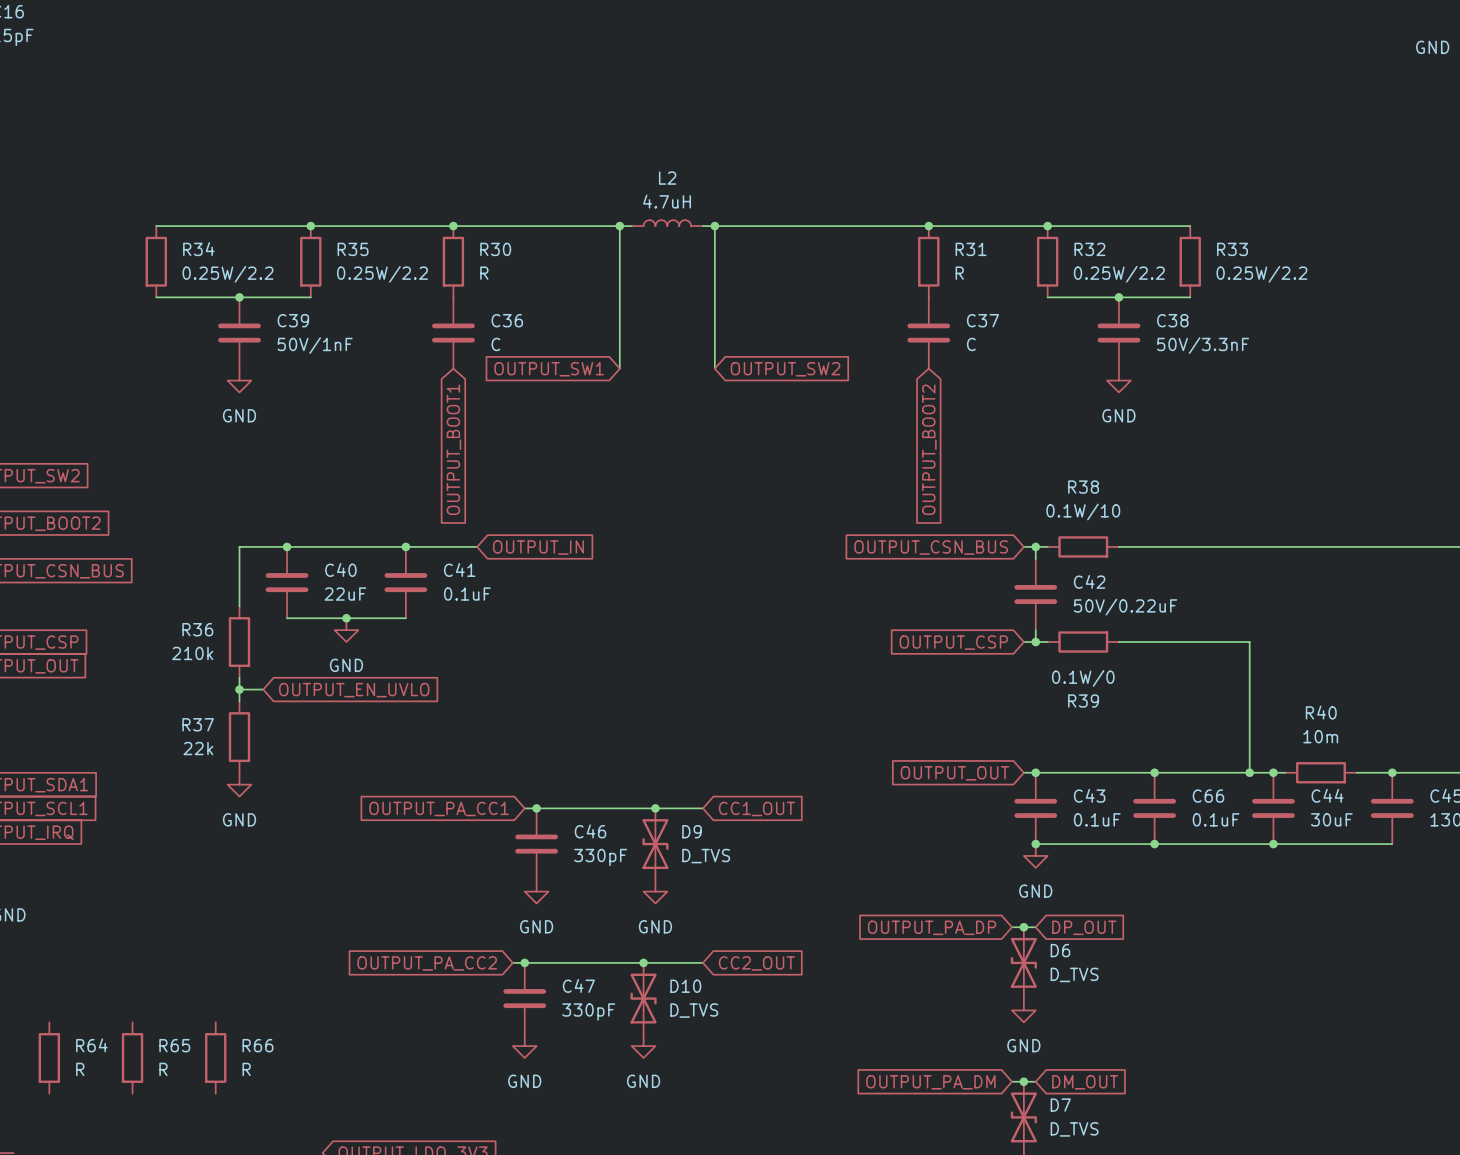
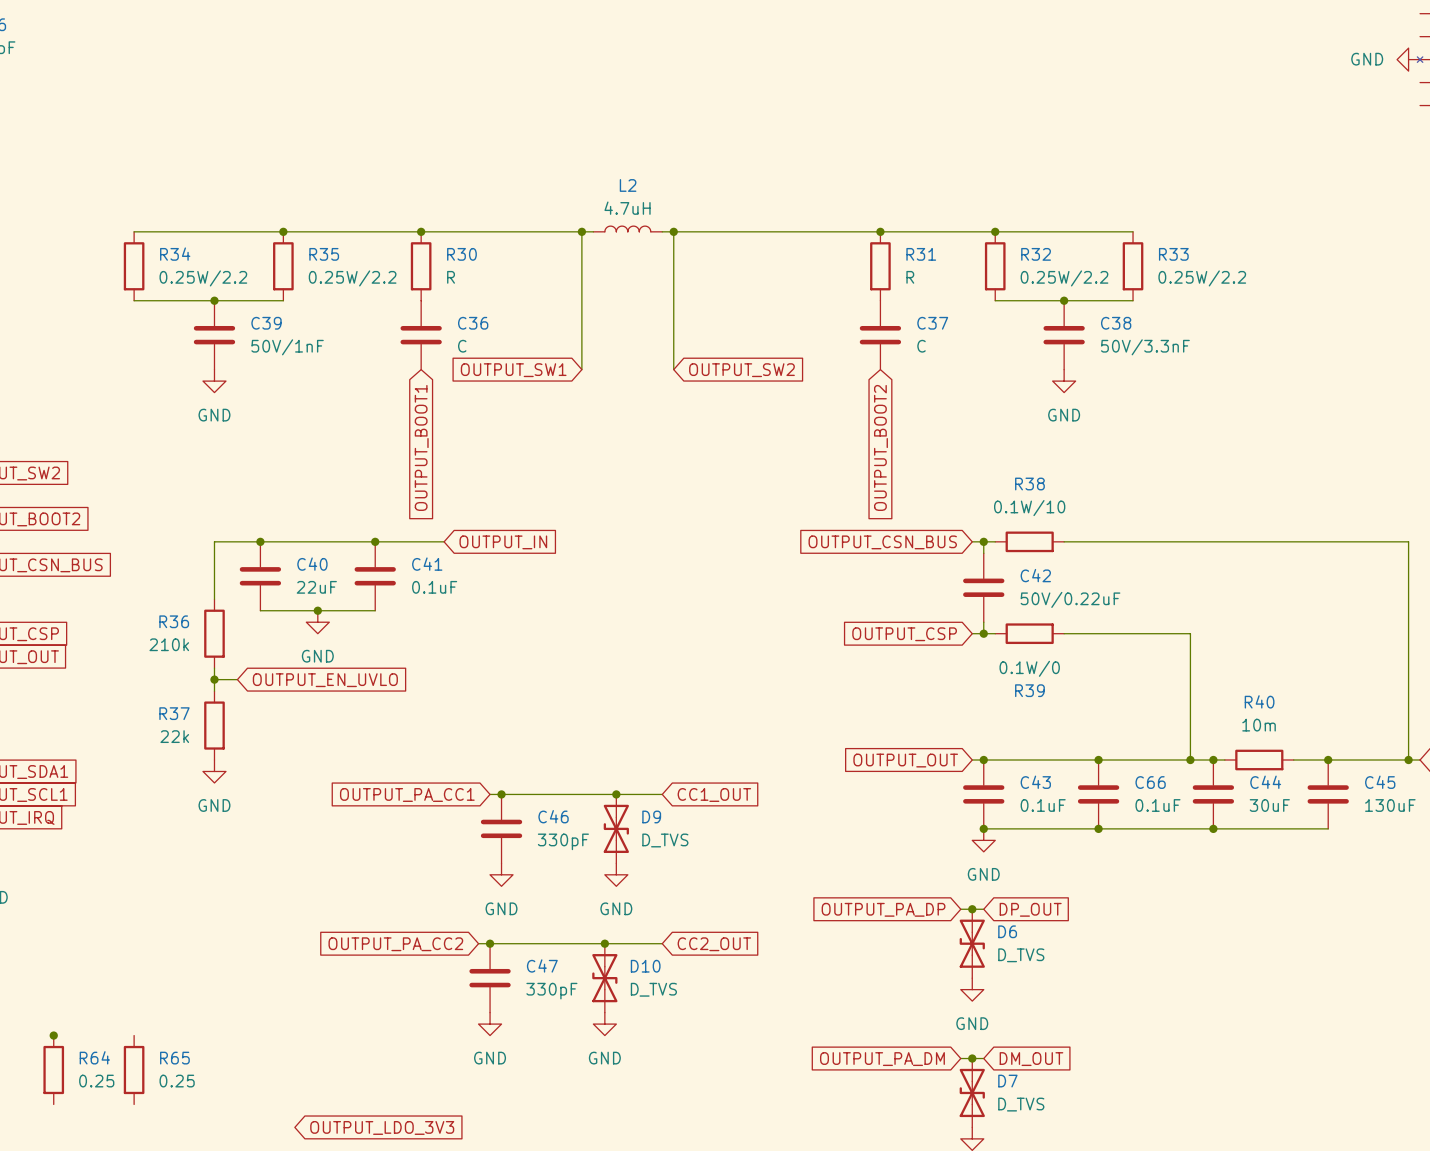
R64 position: (49, 1057) -> (53, 1070)
junction: none -> (53, 1035)
R65 position: (132, 1057) -> (134, 1070)
R66: R (215, 1057) -> none
R64 value: R (80, 1069) -> 0.25 (96, 1081)
R65 value: R (163, 1069) -> 0.25 (177, 1081)

